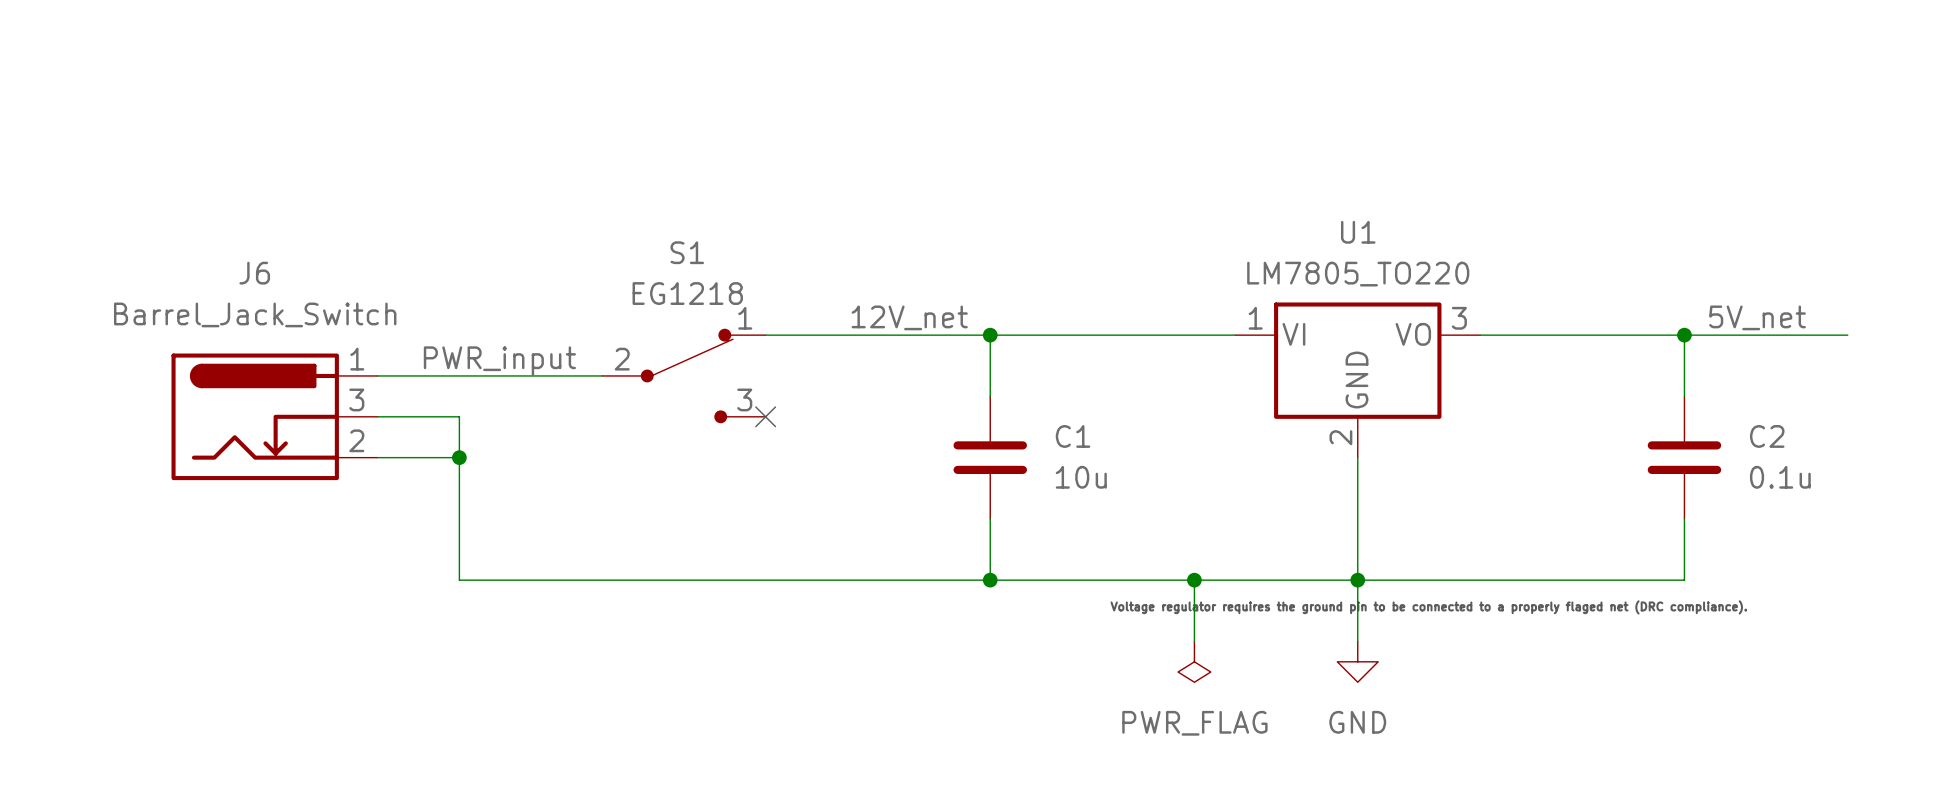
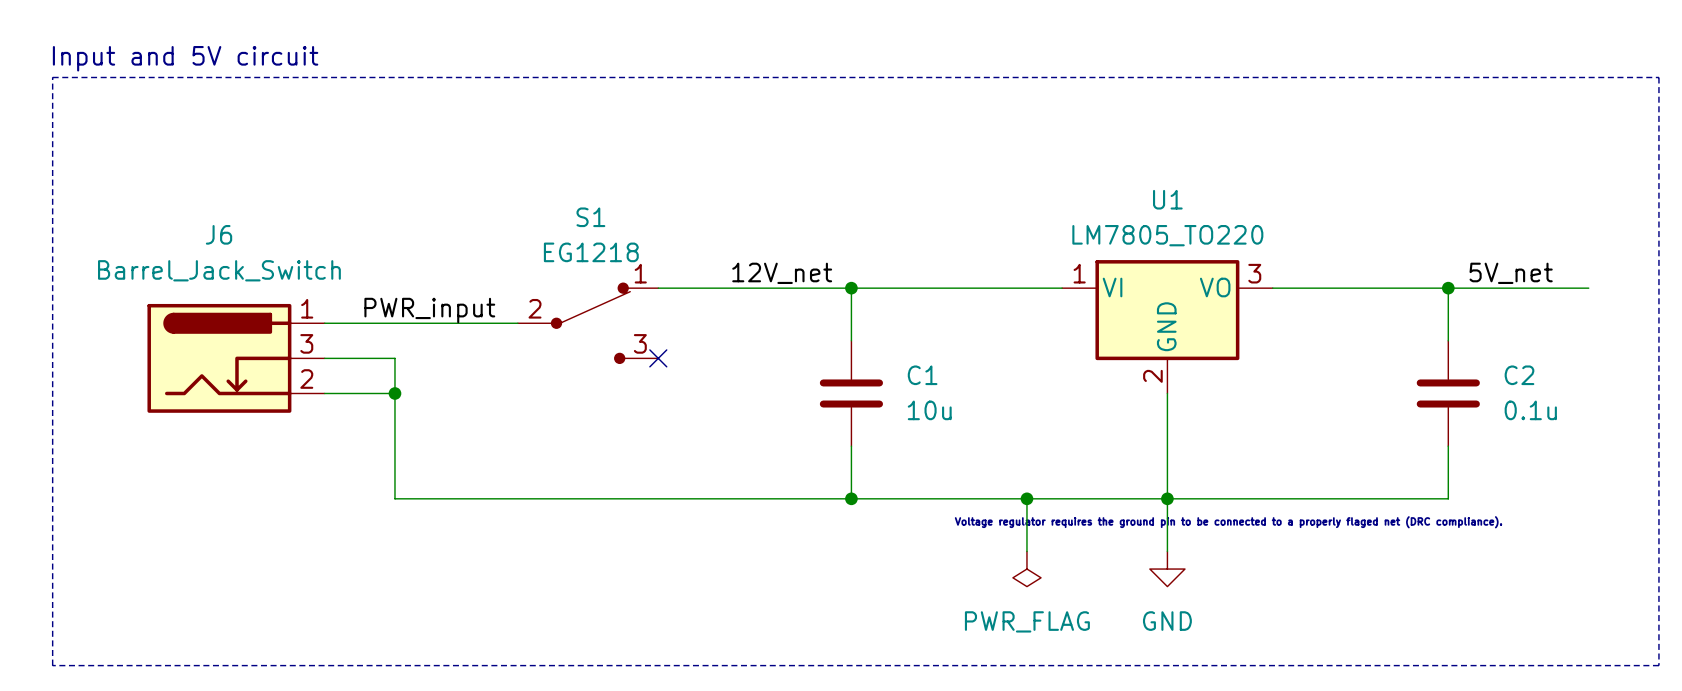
text: none -> Input and 5V circuit (185, 58)
line: none -> (52, 77) (1658, 77) (1658, 665) (52, 665) (52, 77)

